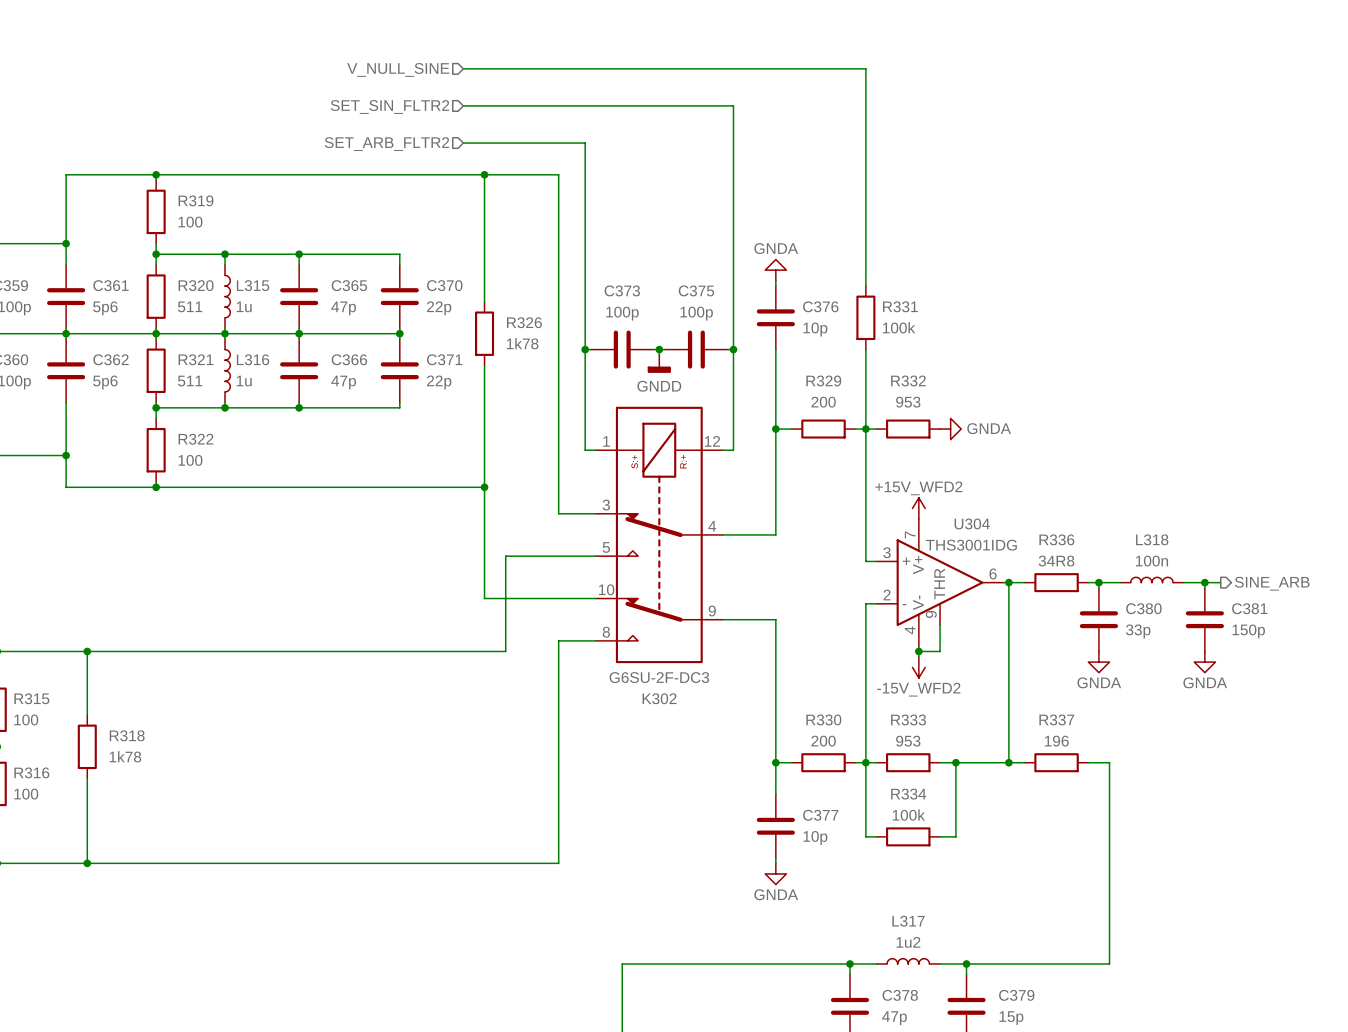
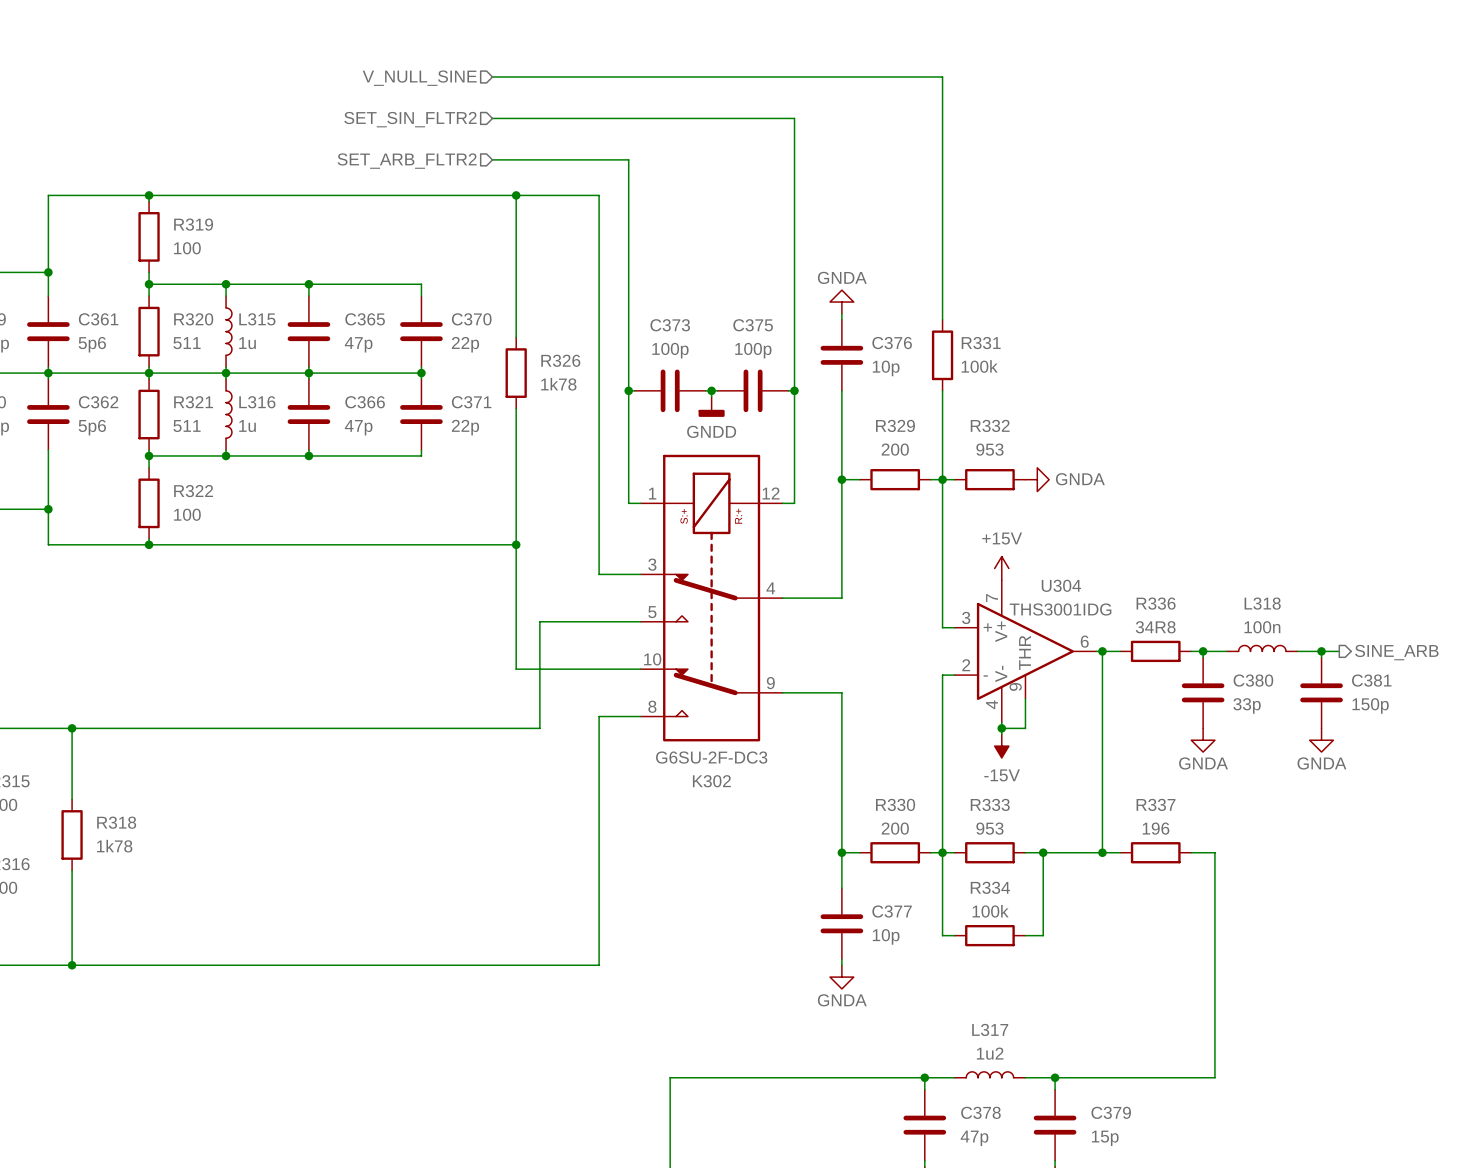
power symbol: +15V_WFD2 (918, 508) -> +15V (1001, 568)
power symbol: -15V_WFD2 (918, 667) -> -15V (1001, 746)

